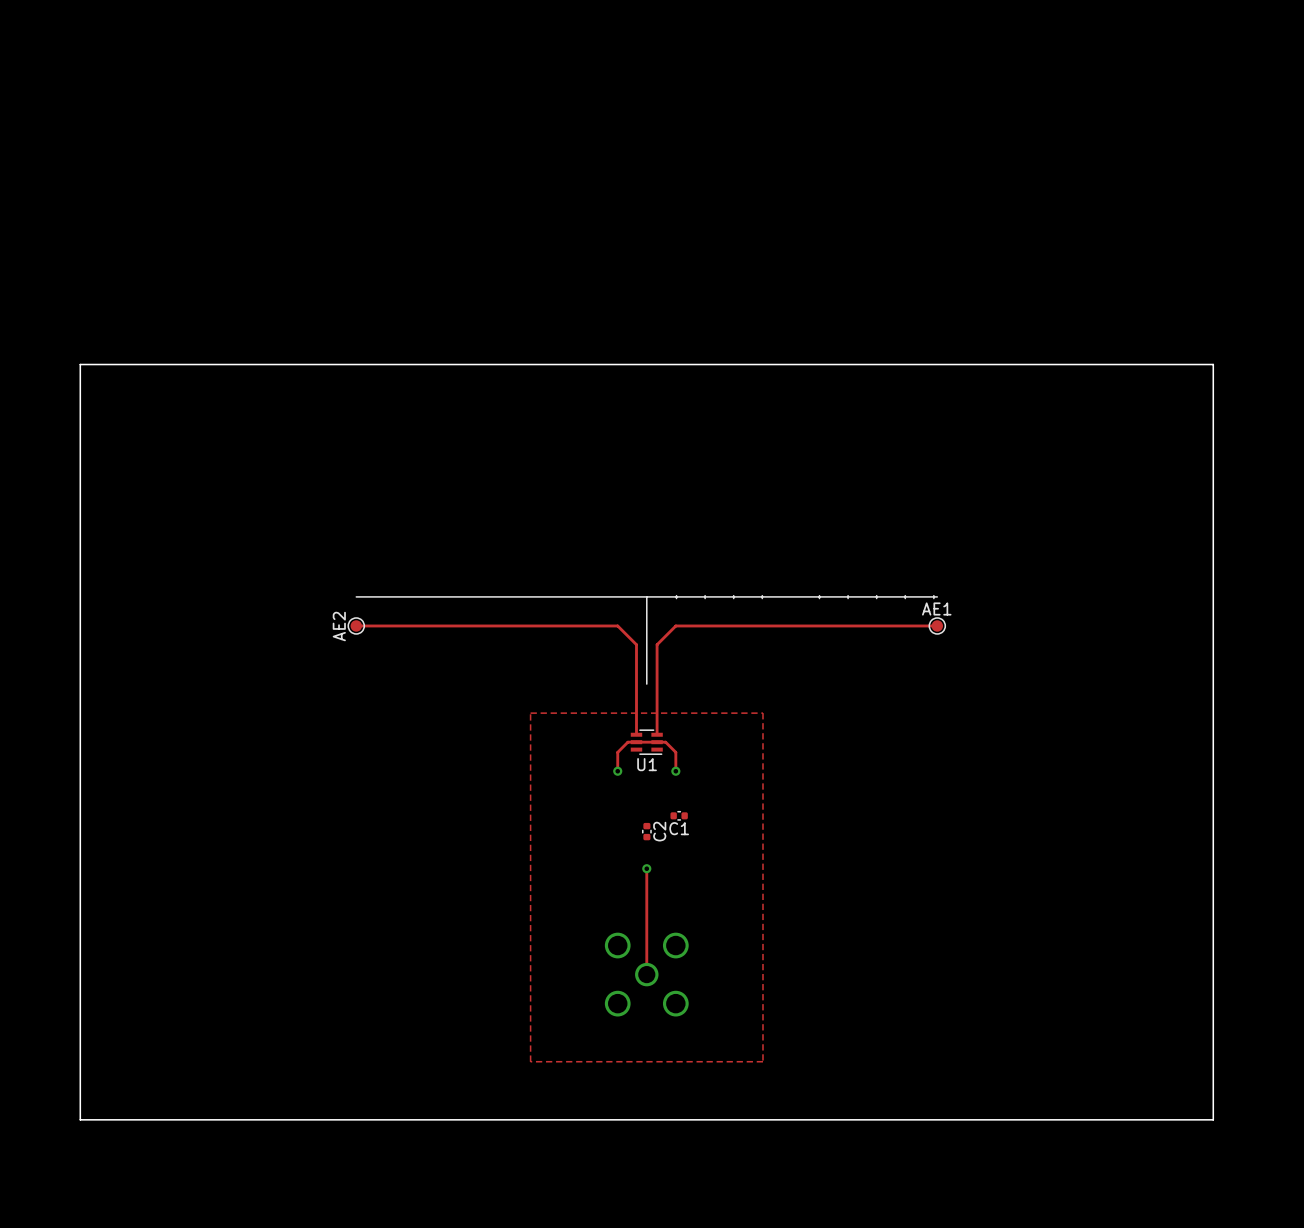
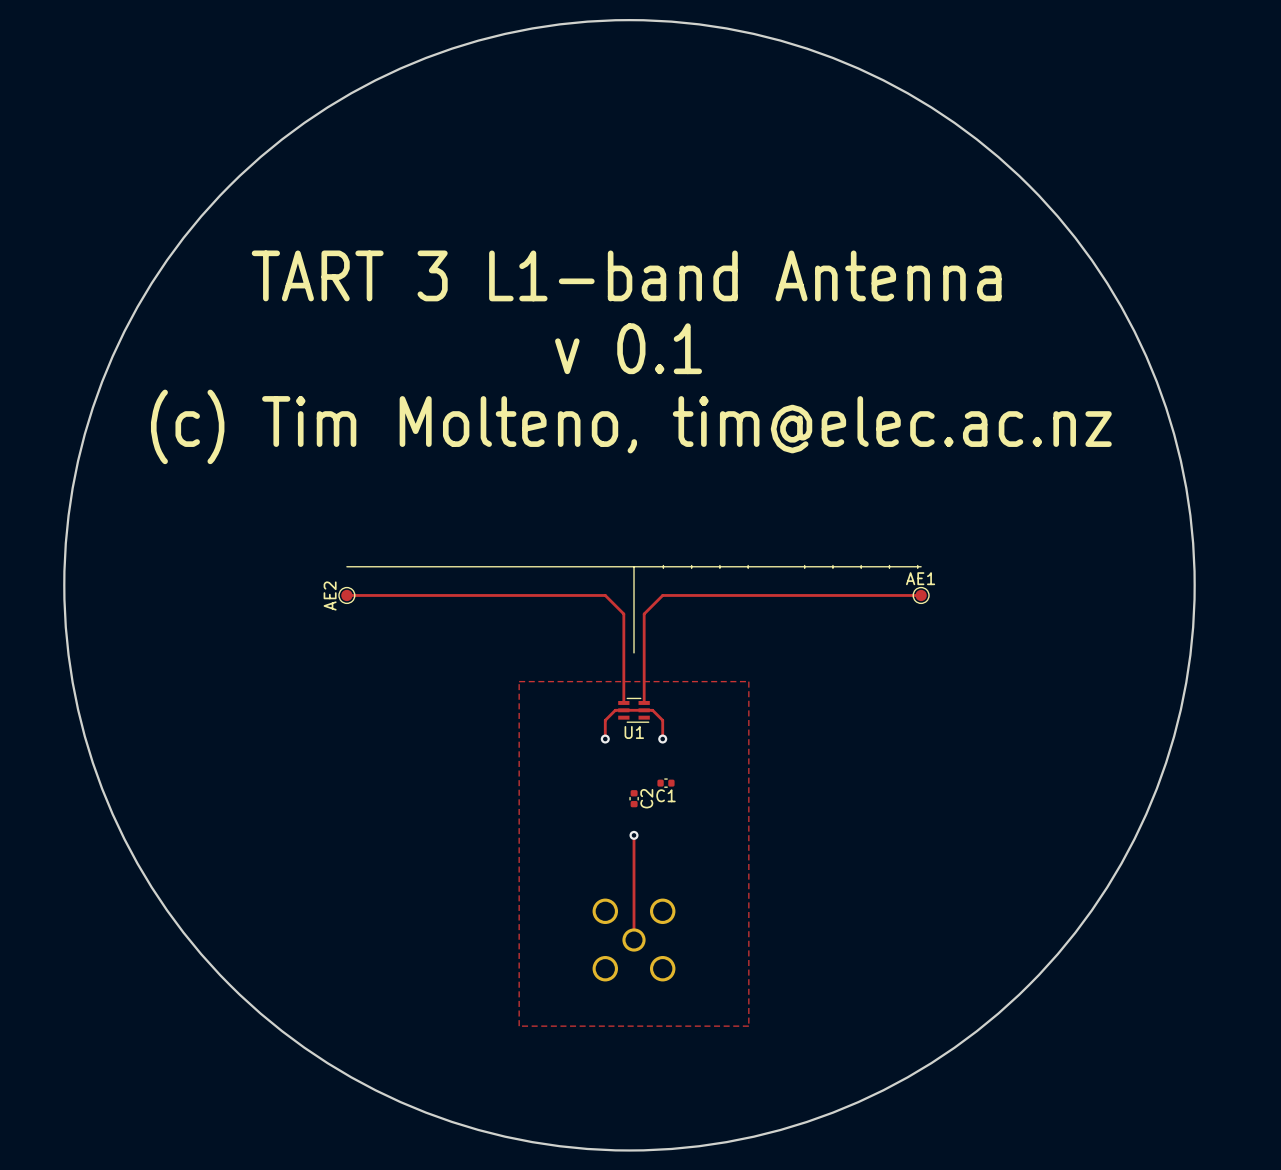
round board edge: none -> [63, 18, 1196, 1152]
text: none -> TART 3 L1-band Antenna (626, 275)
board edge: (80, 364) (1213, 364) (1213, 1119) (80, 1119) (80, 364) -> none
text: none -> v 0.1 (628, 348)
text: none -> (c) Tim Molteno, tim@elec.ac.nz (631, 426)

